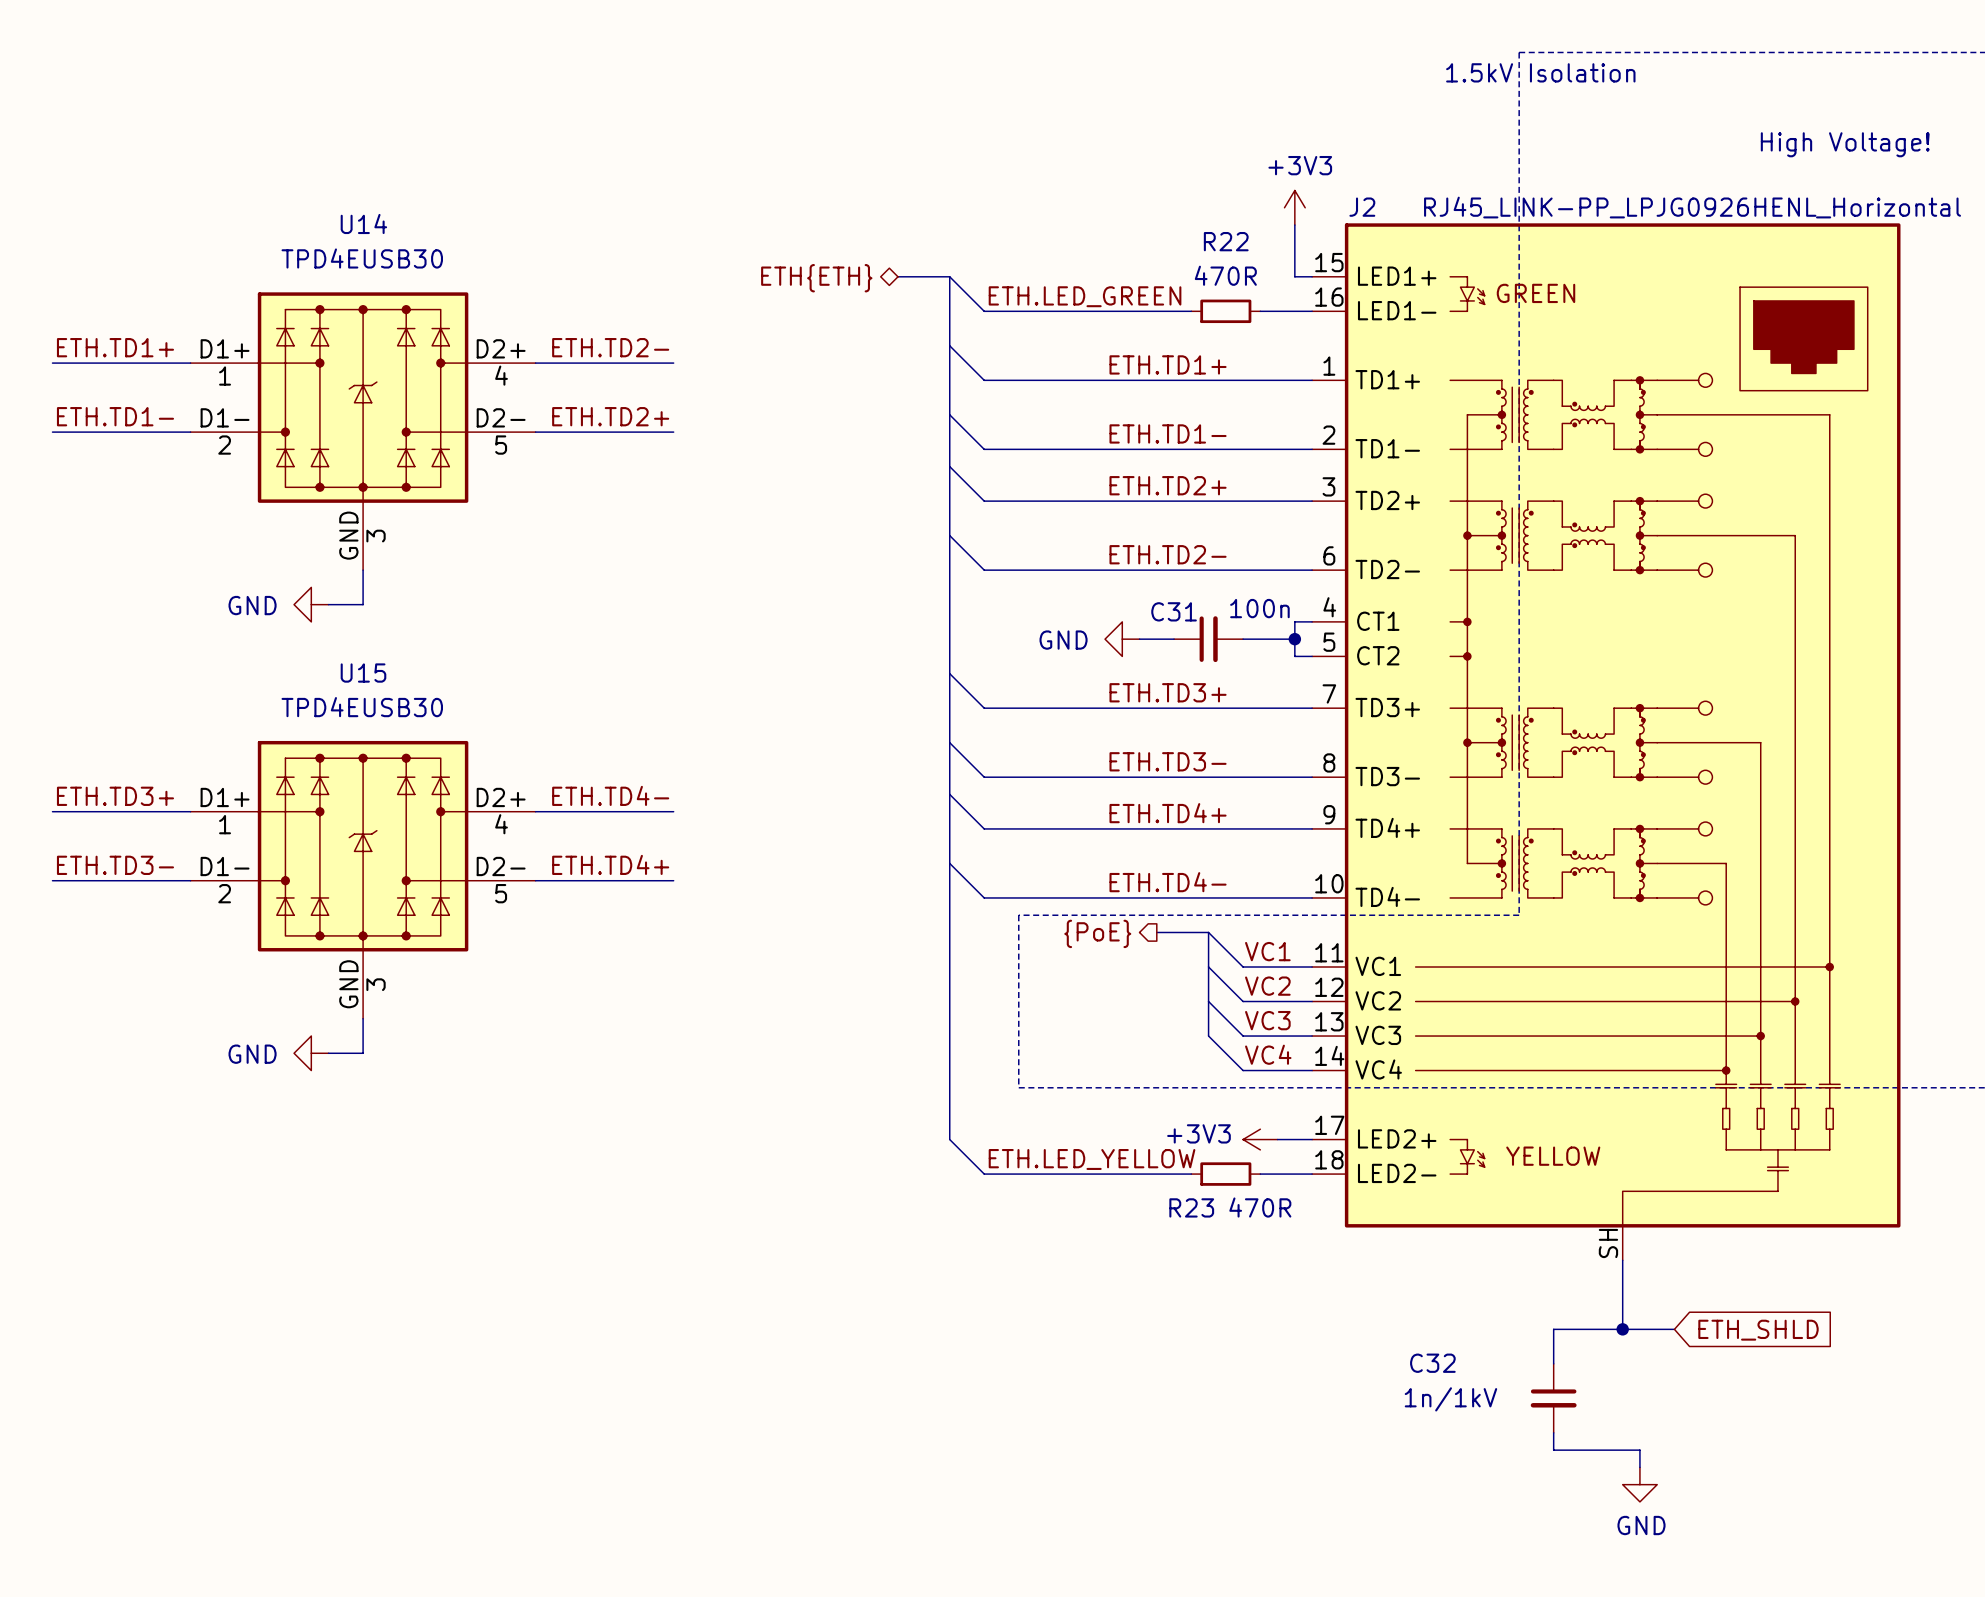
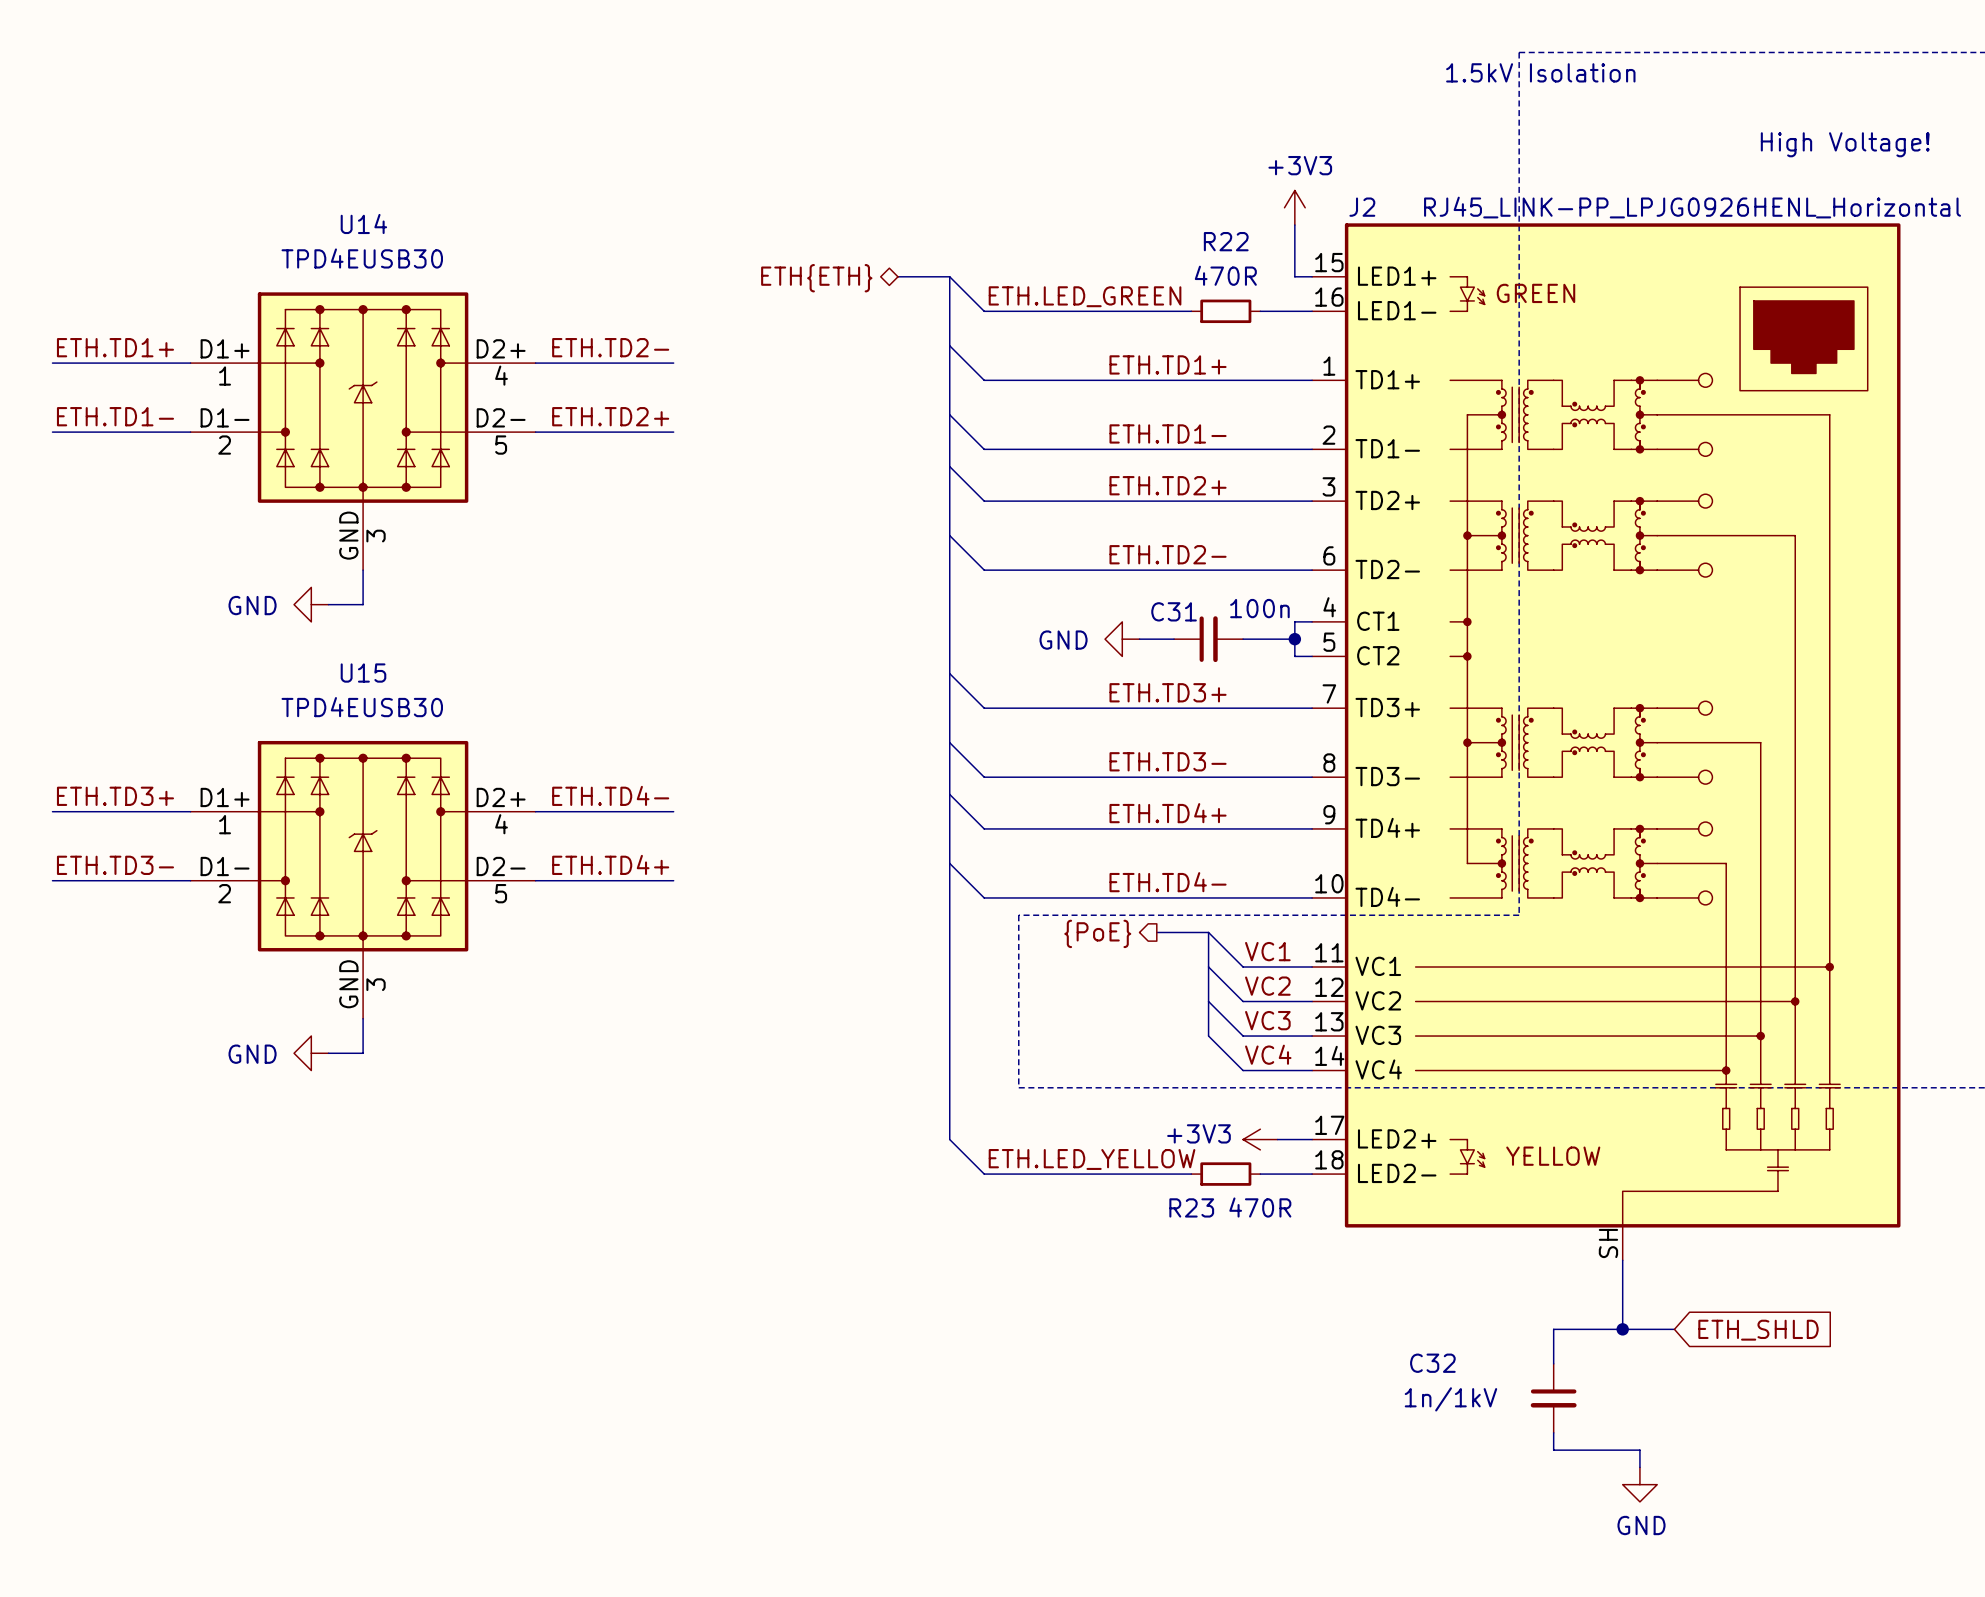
J2 symbol: [1312, 223, 1901, 1261] -> [1312, 223, 1901, 1261]

